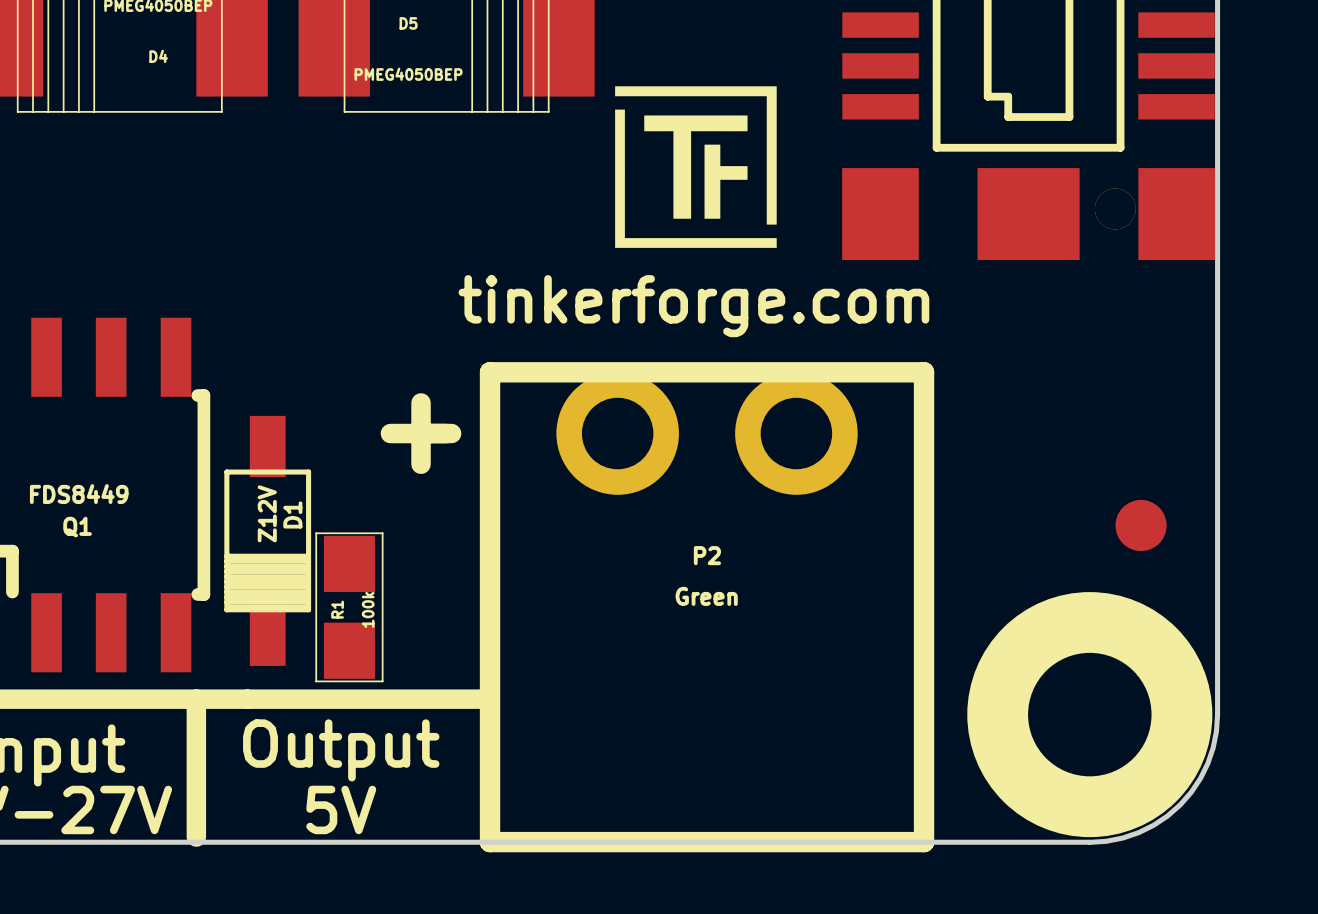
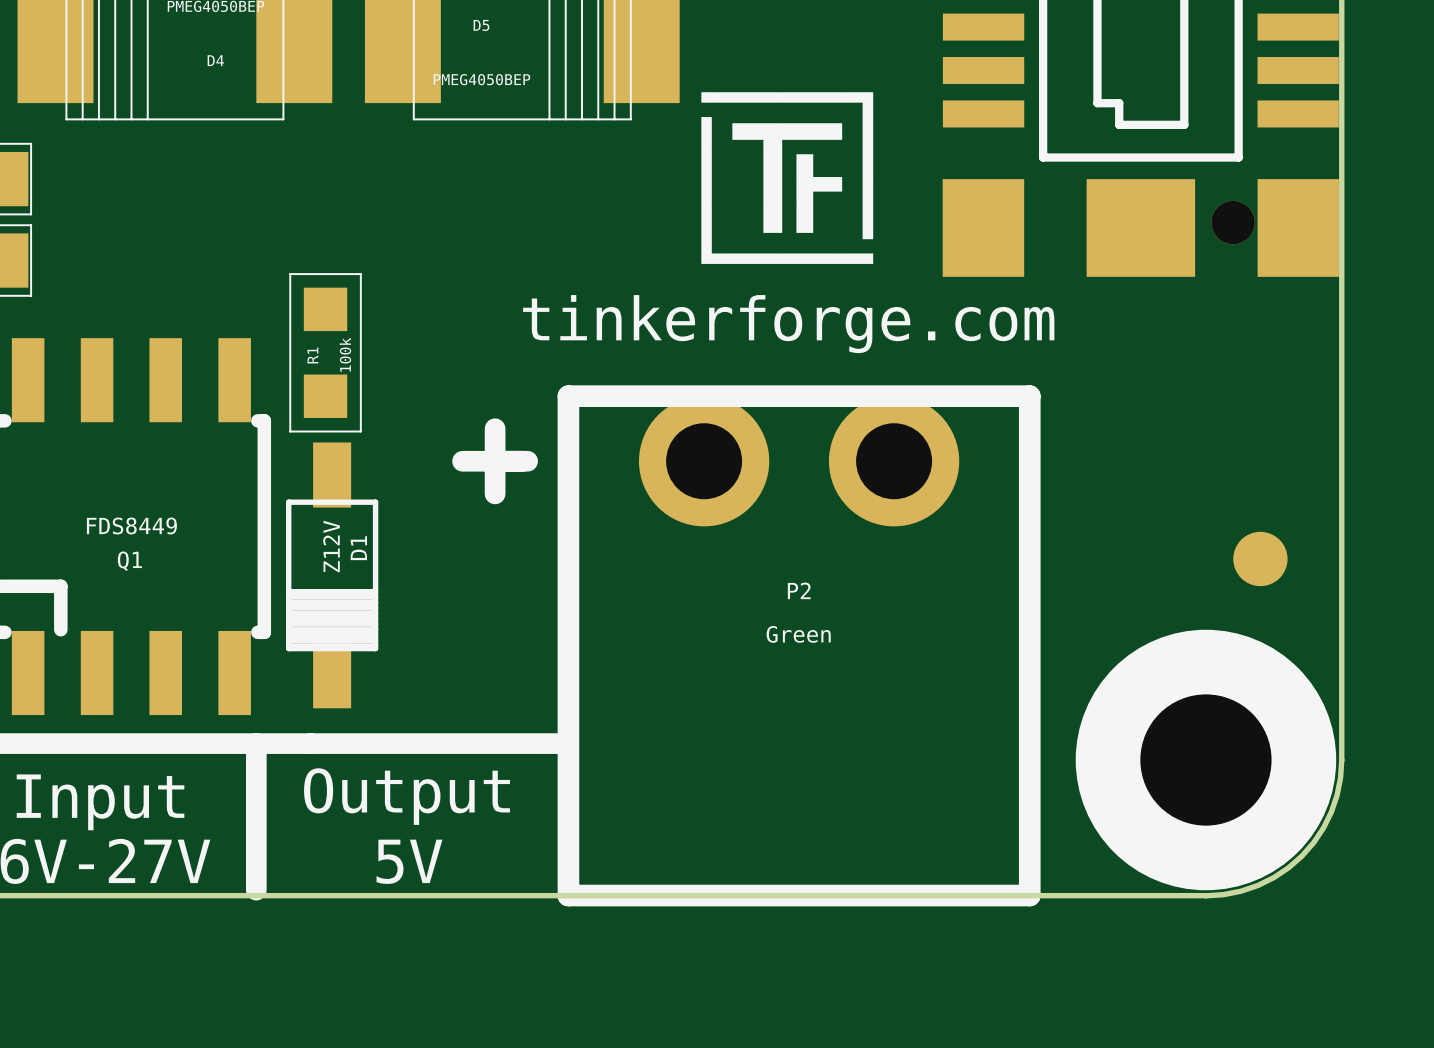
R1 footprint: [316, 533, 383, 682] -> [290, 274, 361, 432]

